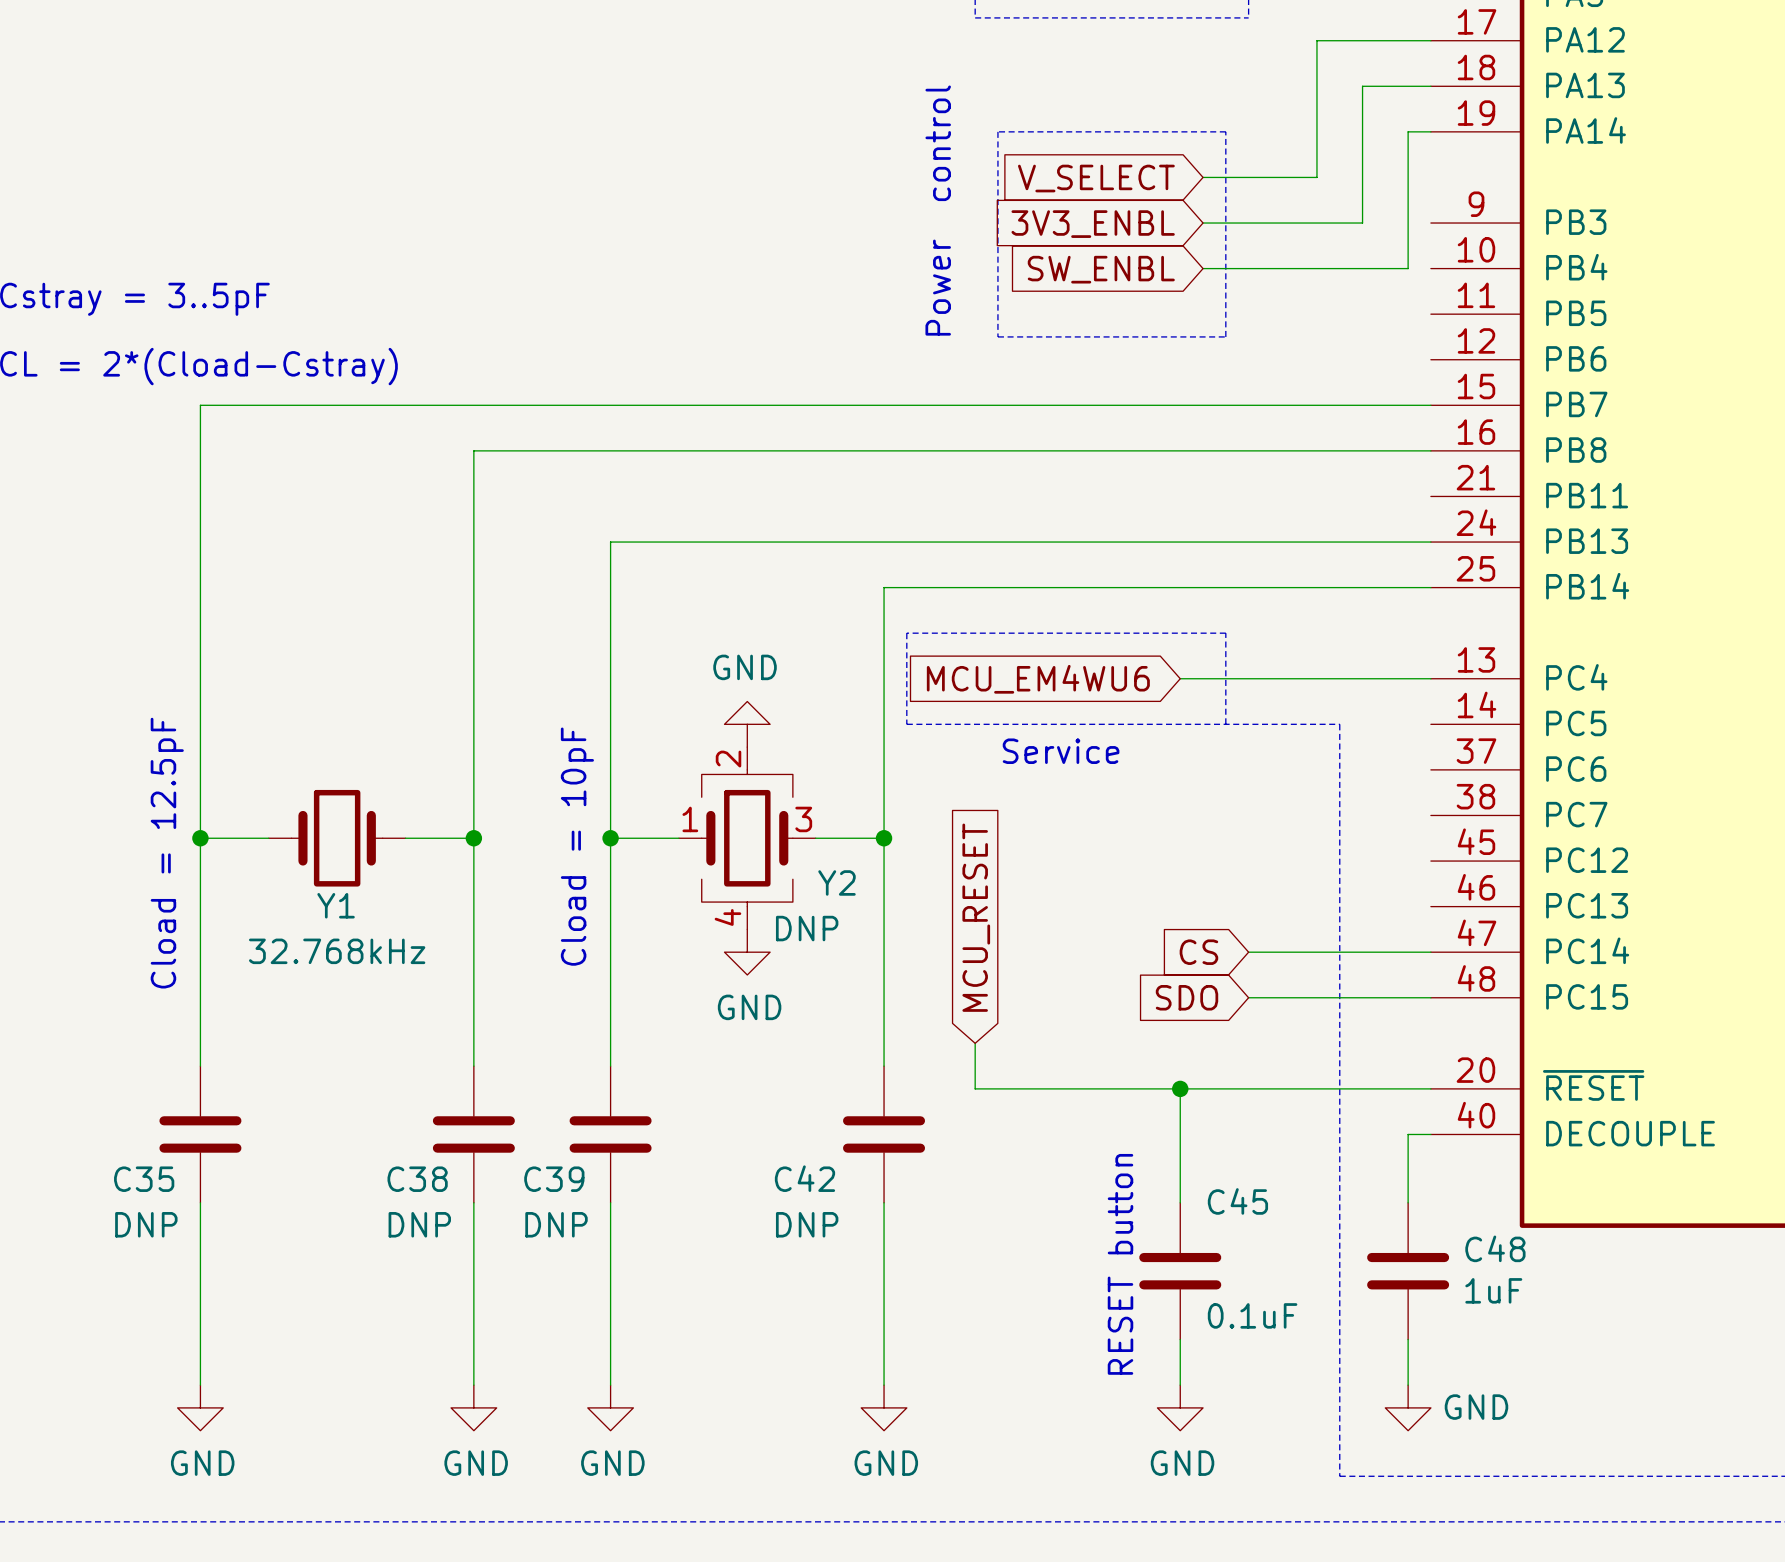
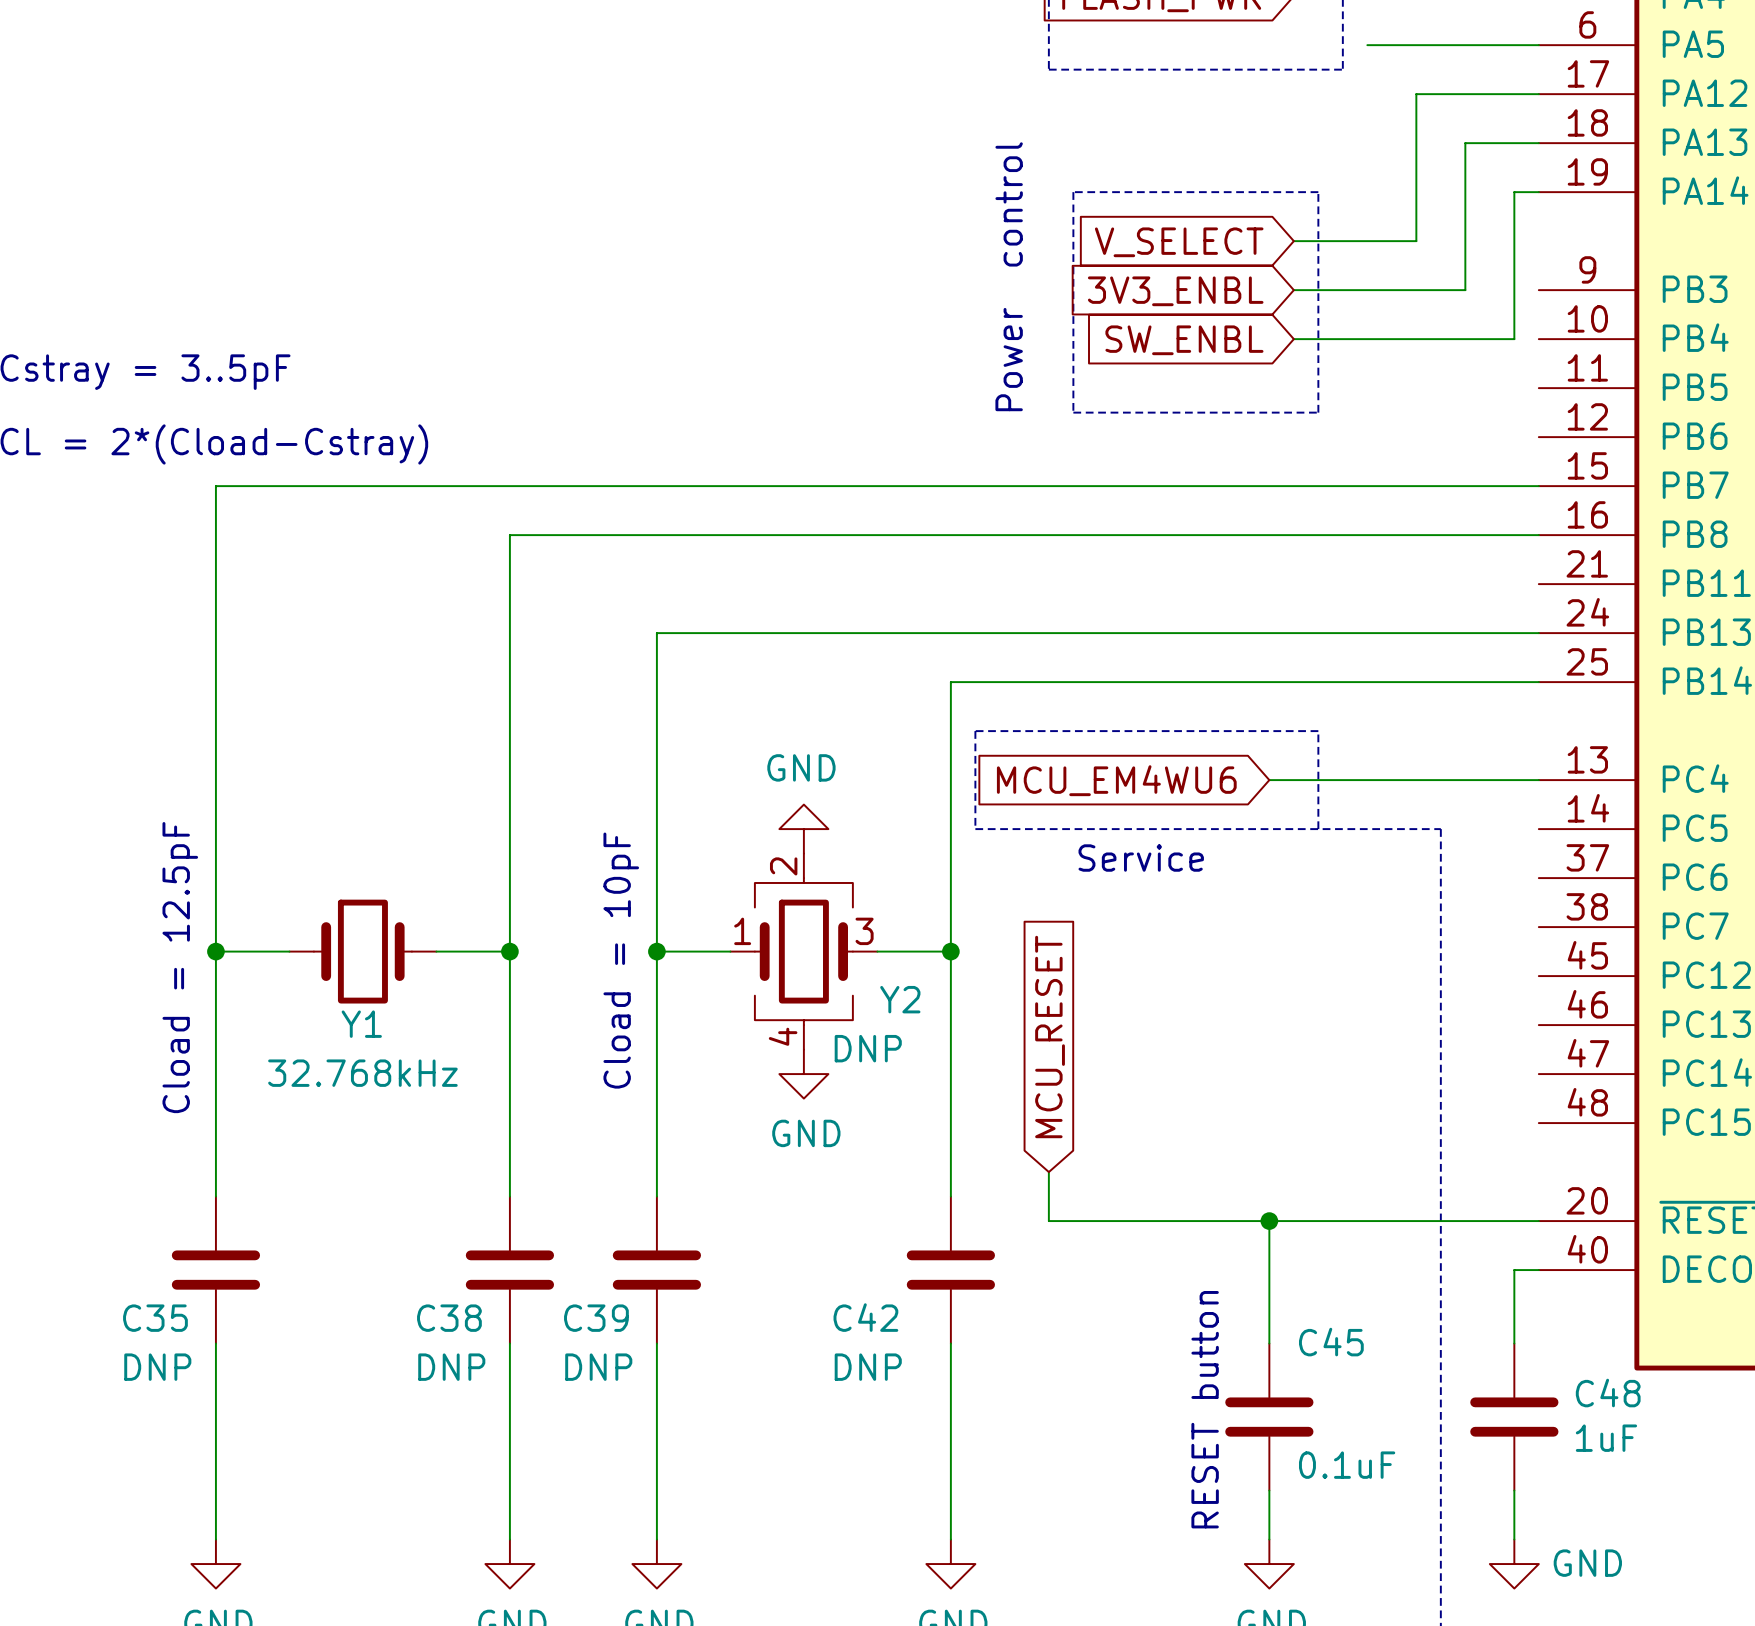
global label: CS (1198, 952) -> none
wire: (1248, 952) (1430, 952) -> none
global label: SDO (1187, 997) -> none
wire: (1248, 997) (1430, 997) -> none

